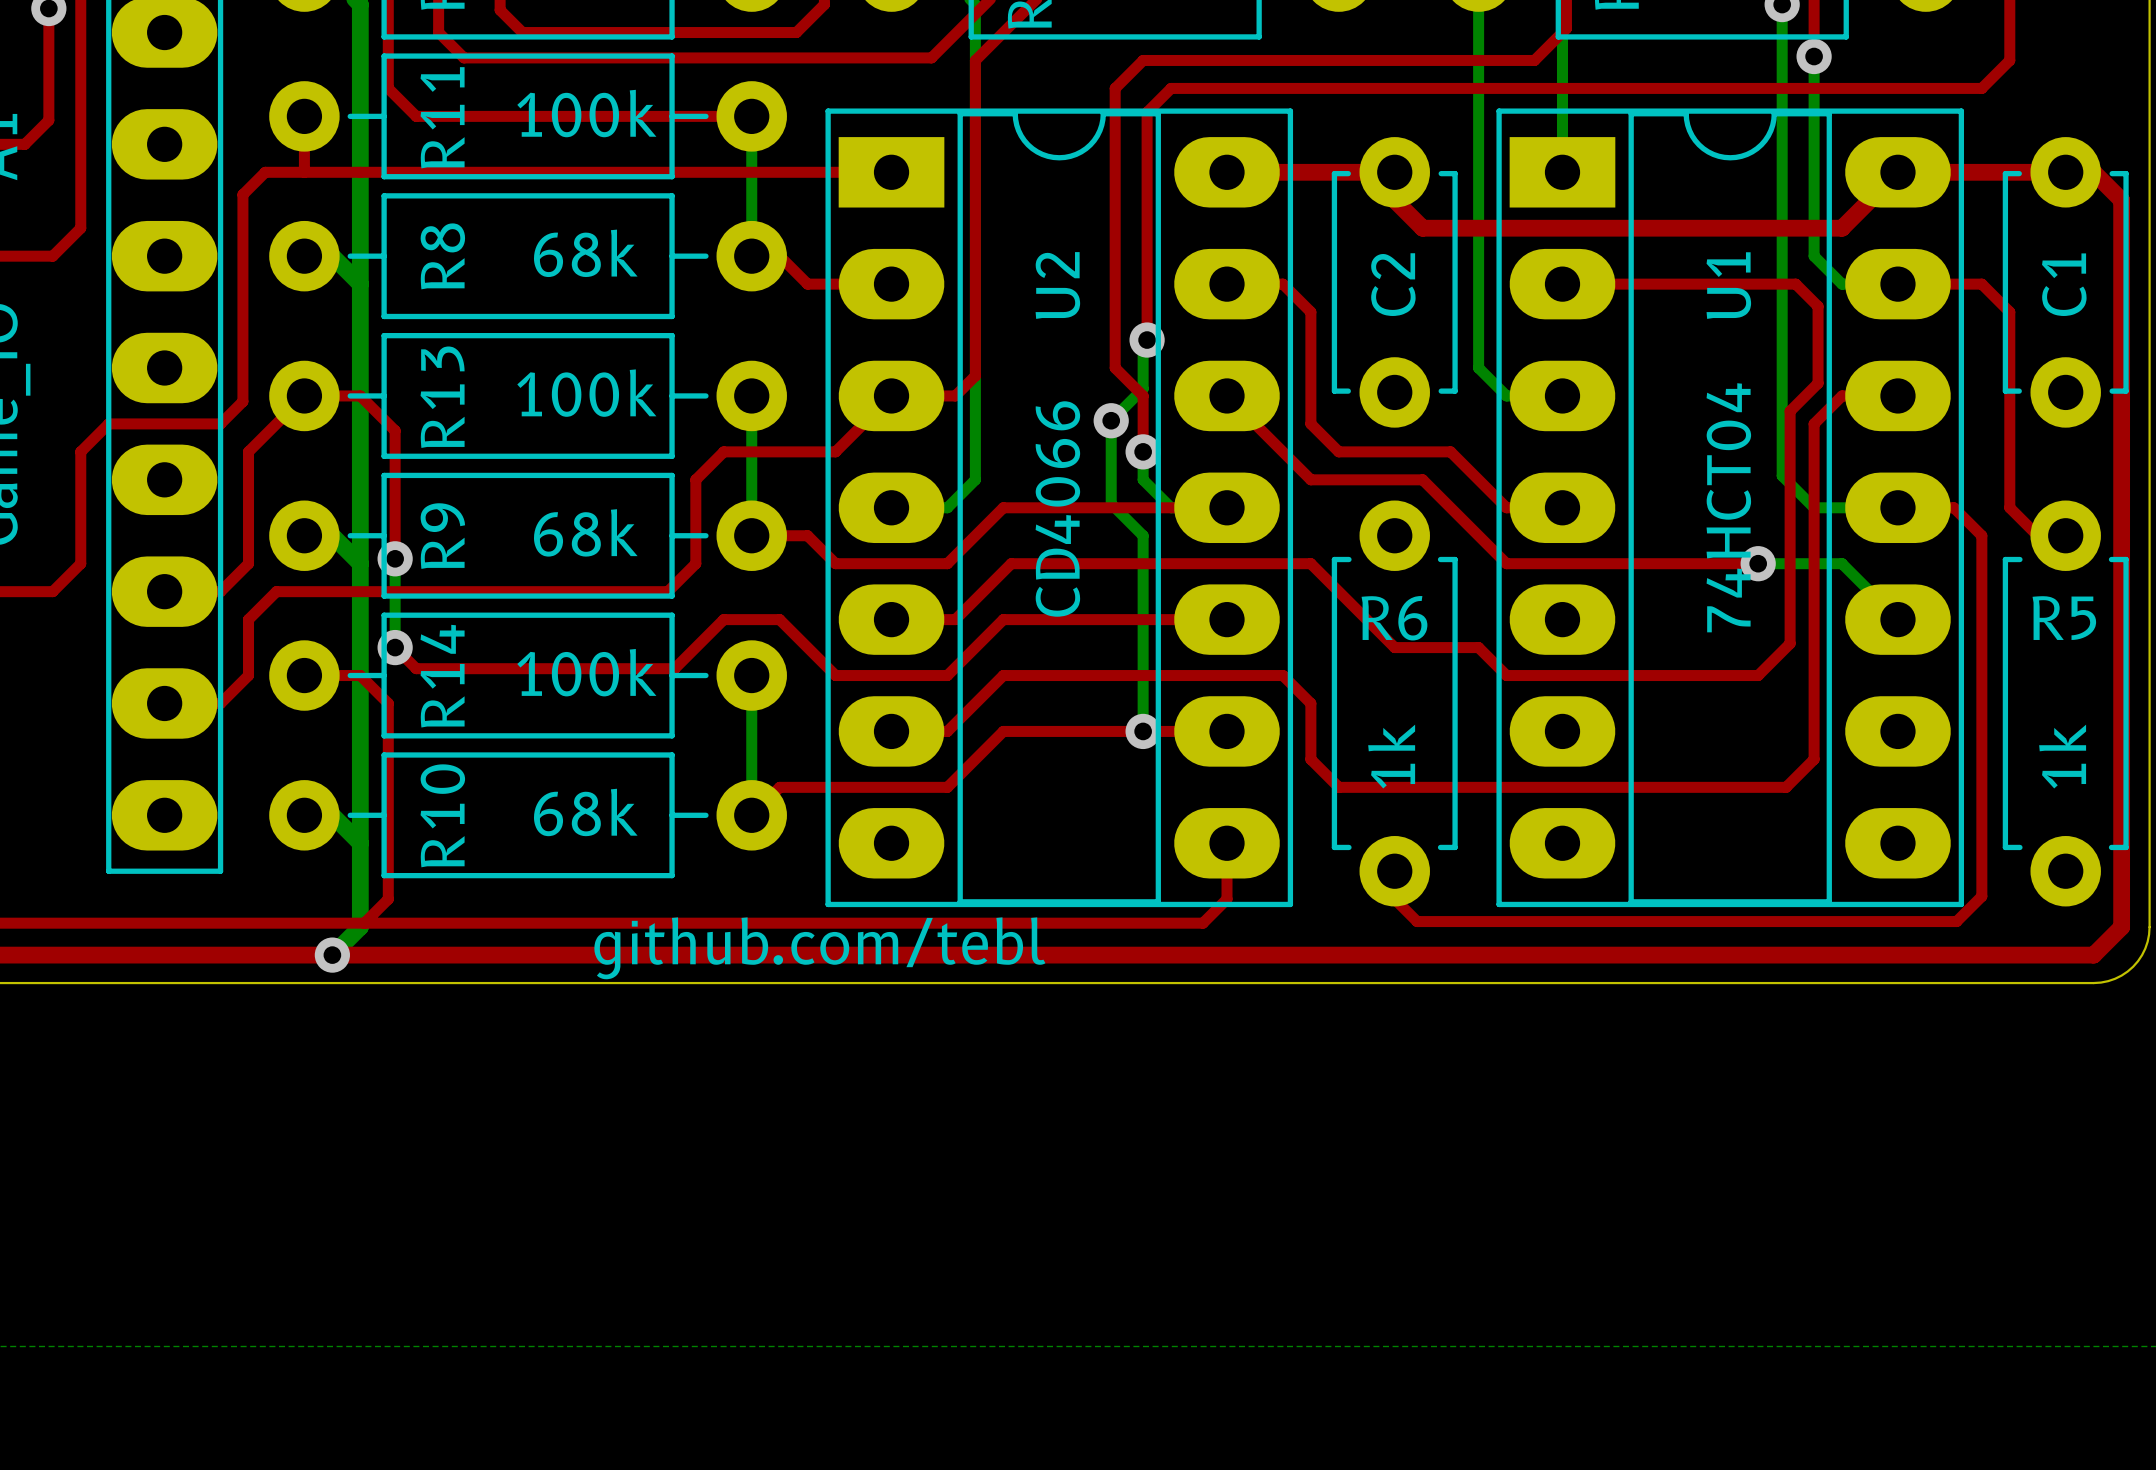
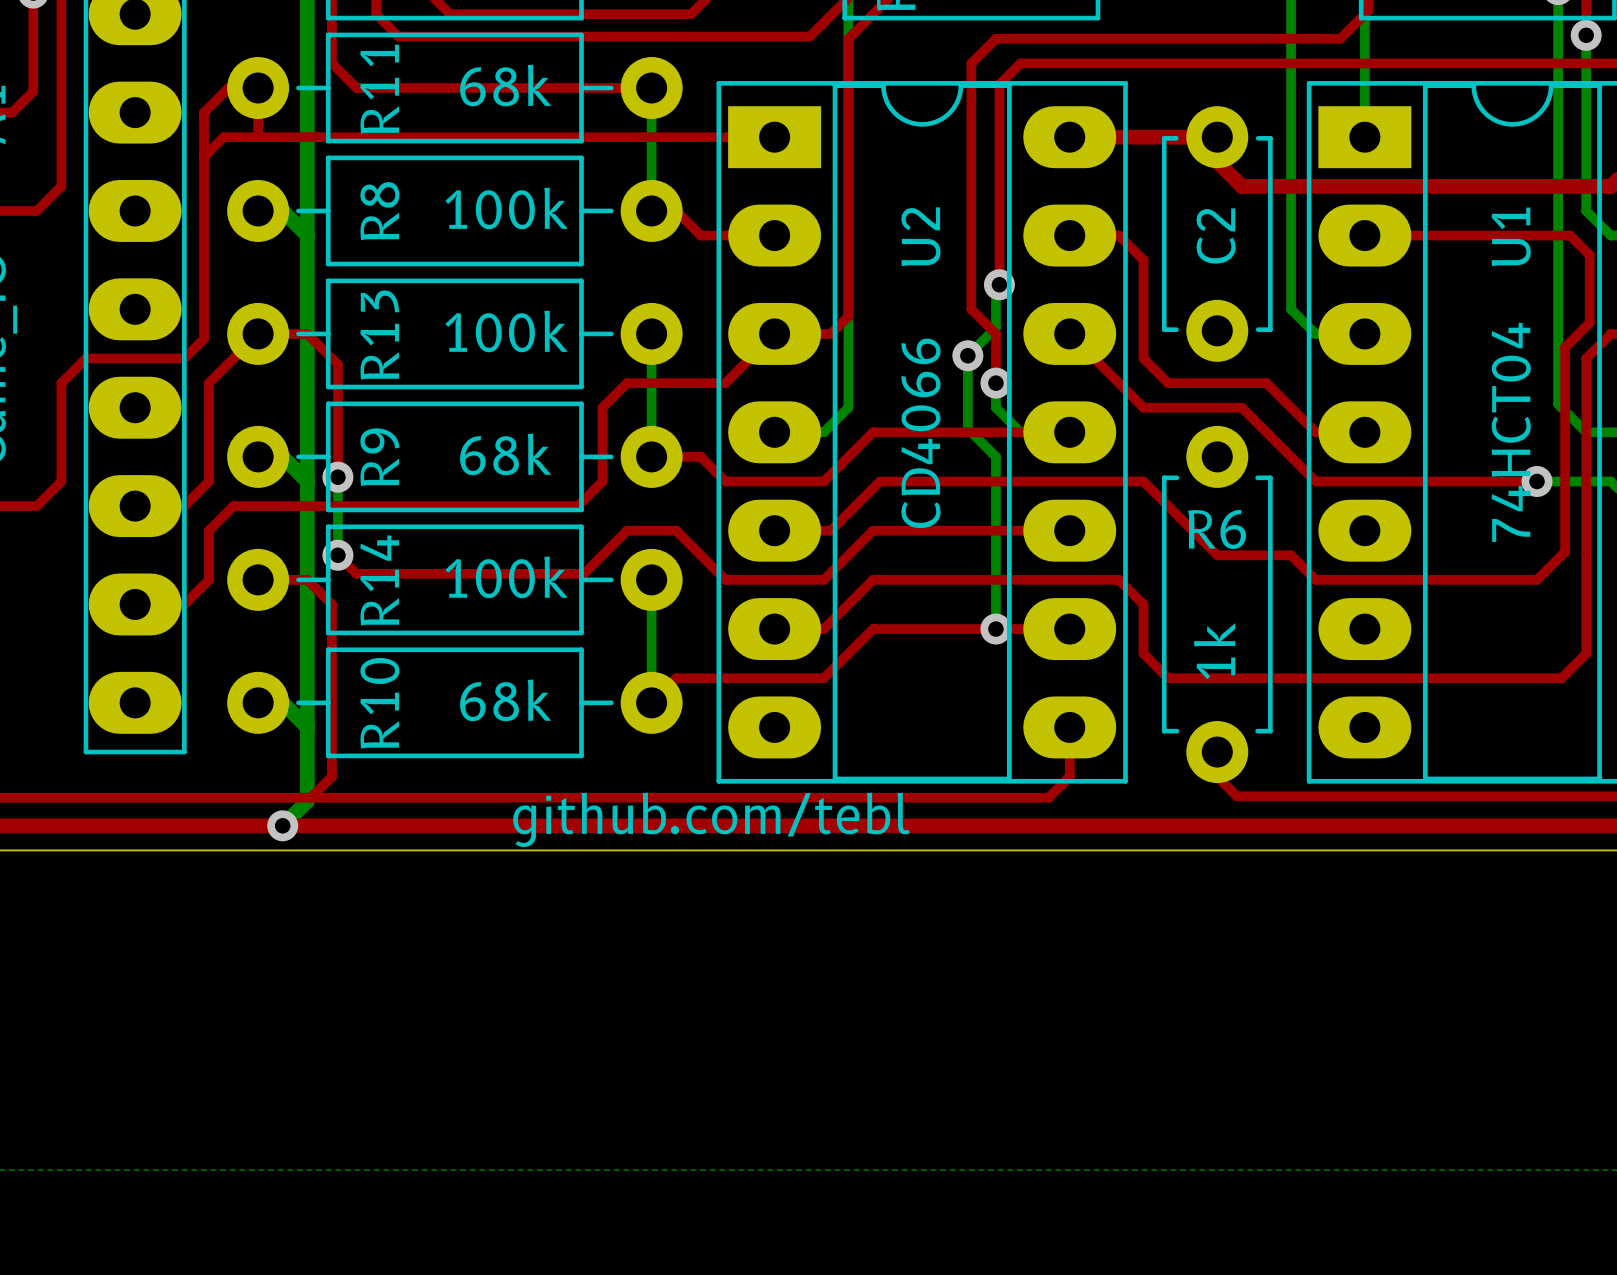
R11 value position: 100k (586, 113) -> 100k (506, 208)
top track: none -> (258, 87) (228, 87) (204, 112) (204, 156)
R8 value position: 68k (585, 253) -> 68k (505, 85)

